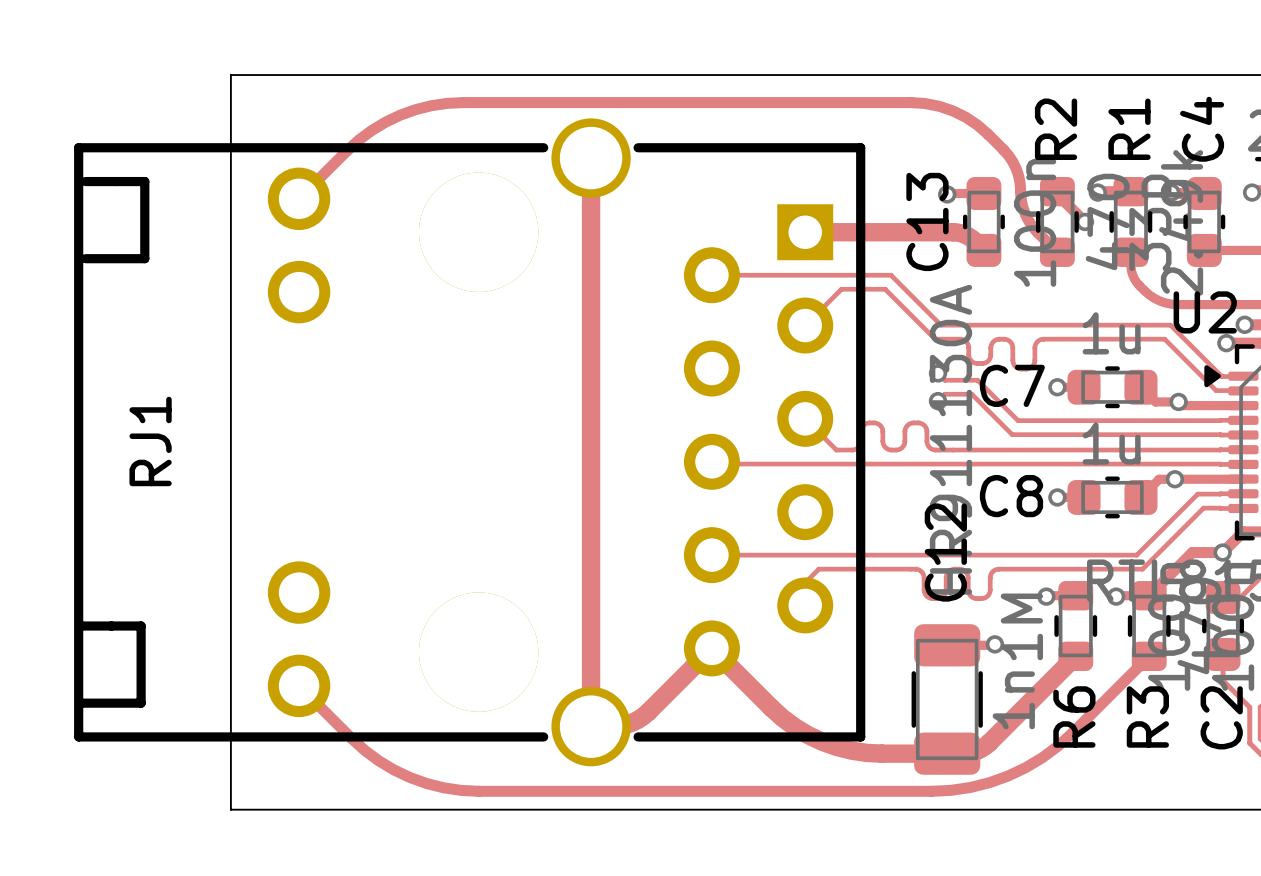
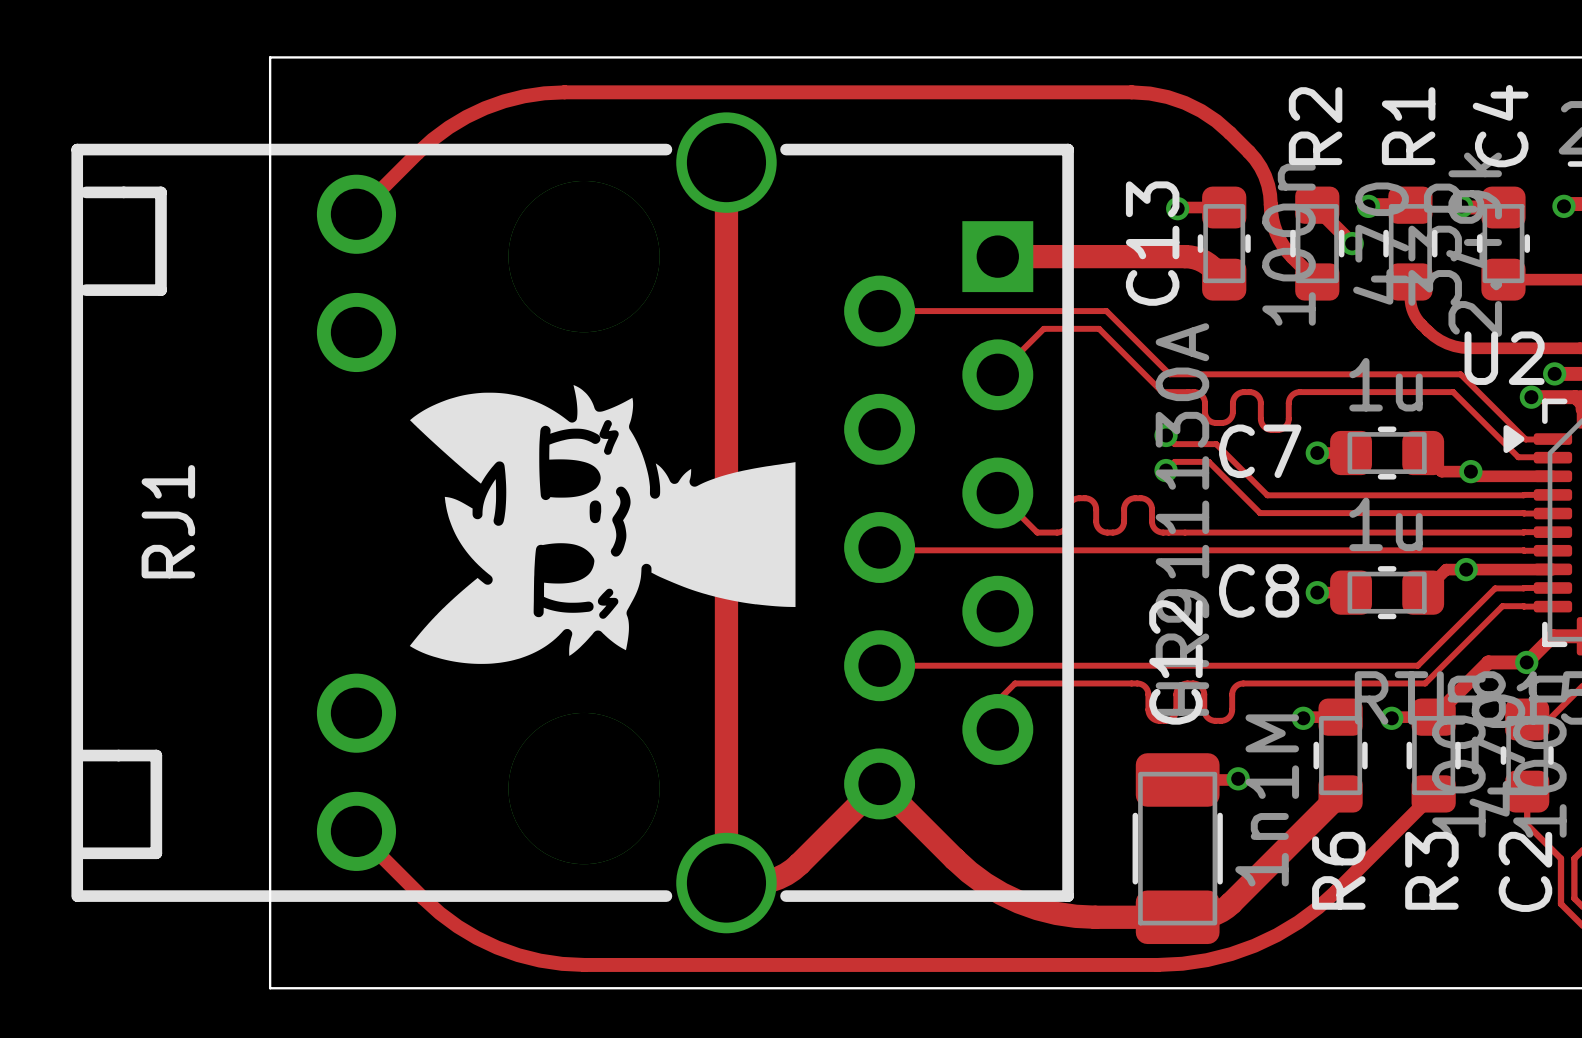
drawing: none -> [409, 384, 796, 664]

